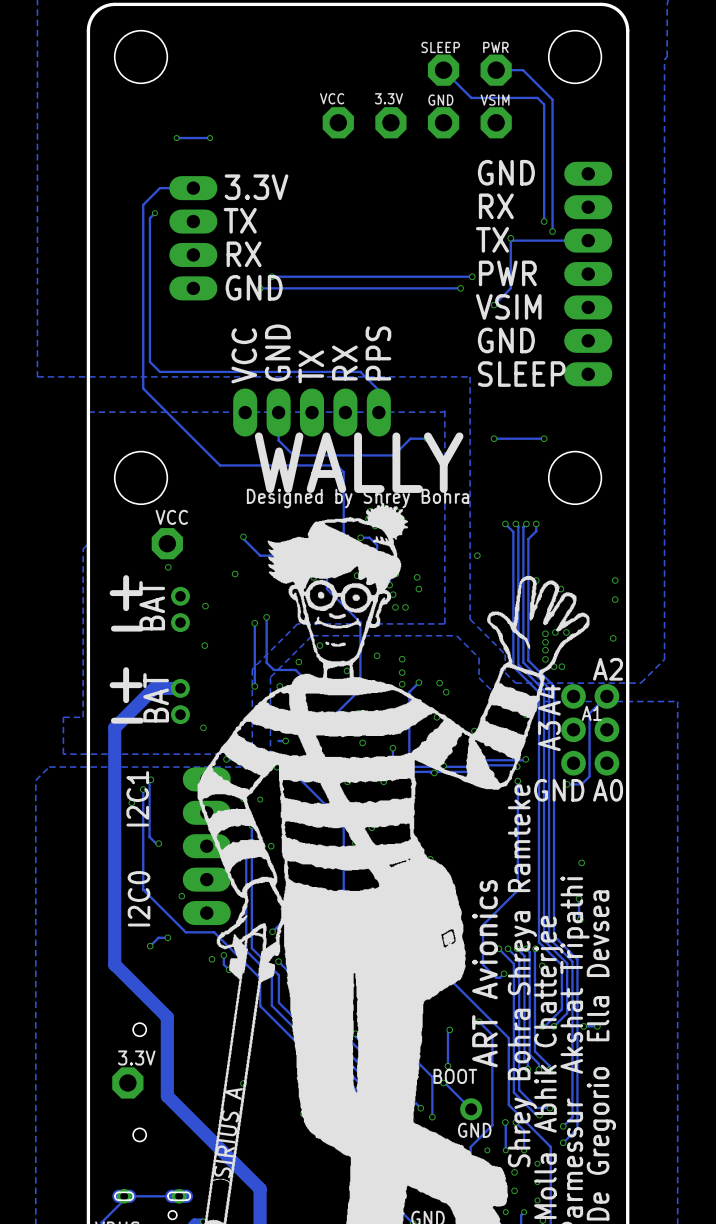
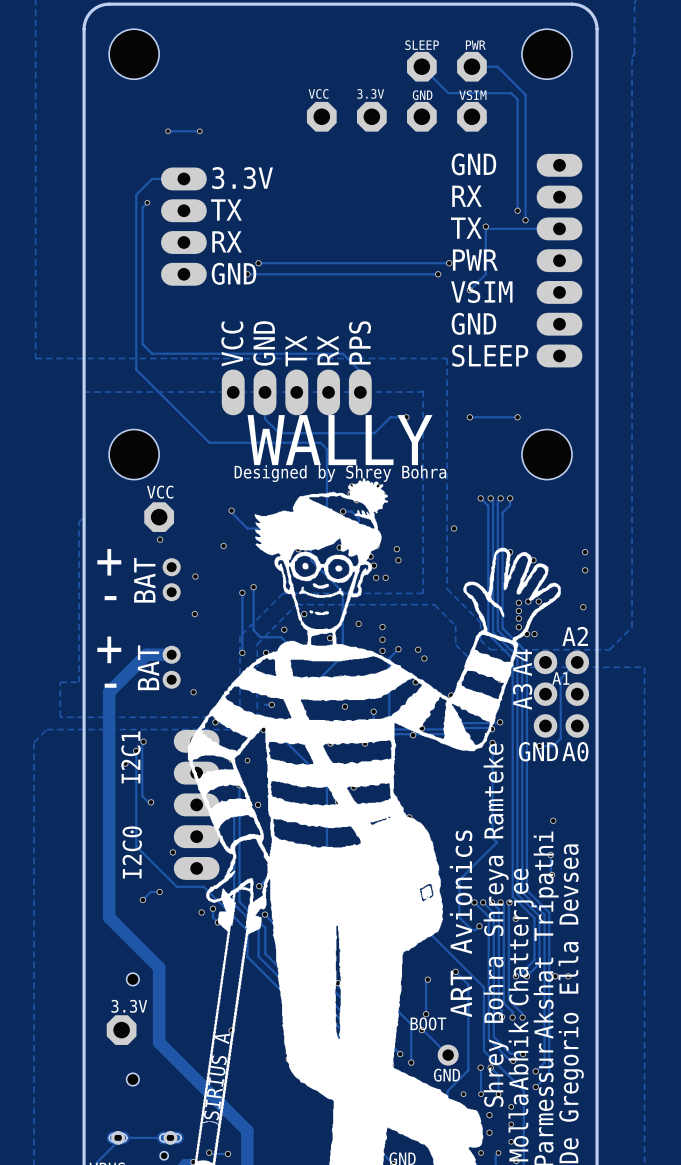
track: none -> (209, 1152) (227, 1153)
via: none -> (209, 1152)
via: none -> (227, 1153)

